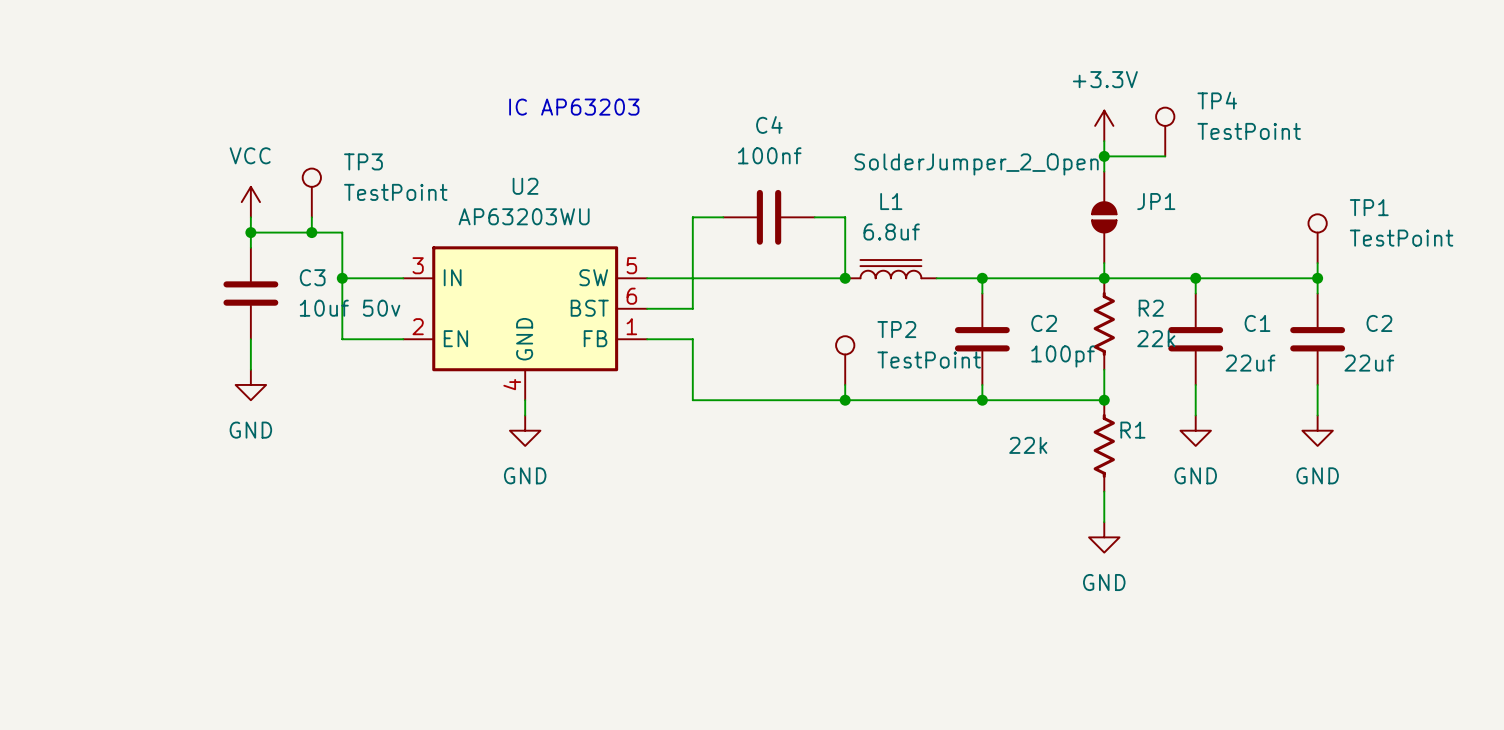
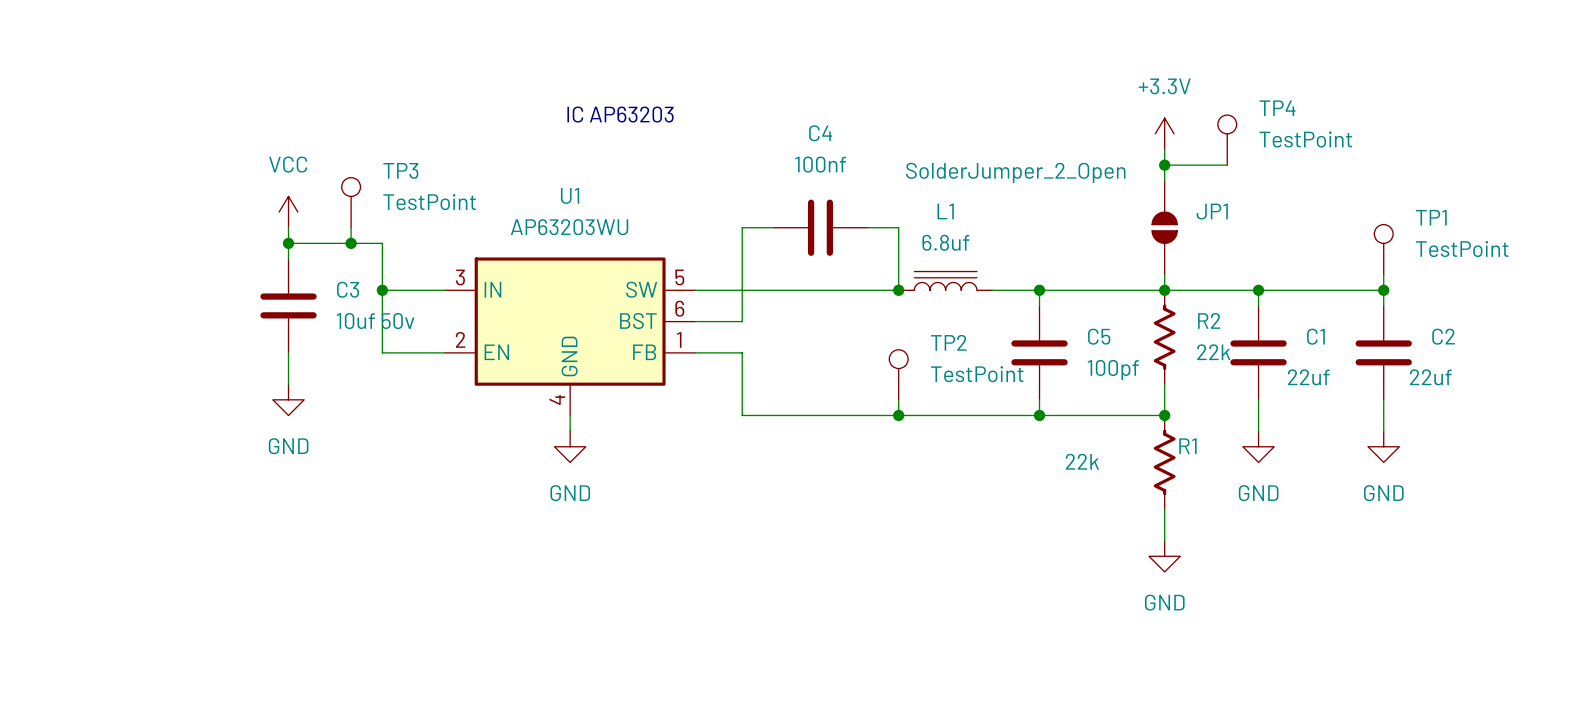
U2 name: U2 (525, 186) -> U1 (570, 195)
C2 name: C2 (1044, 323) -> C5 (1099, 336)

